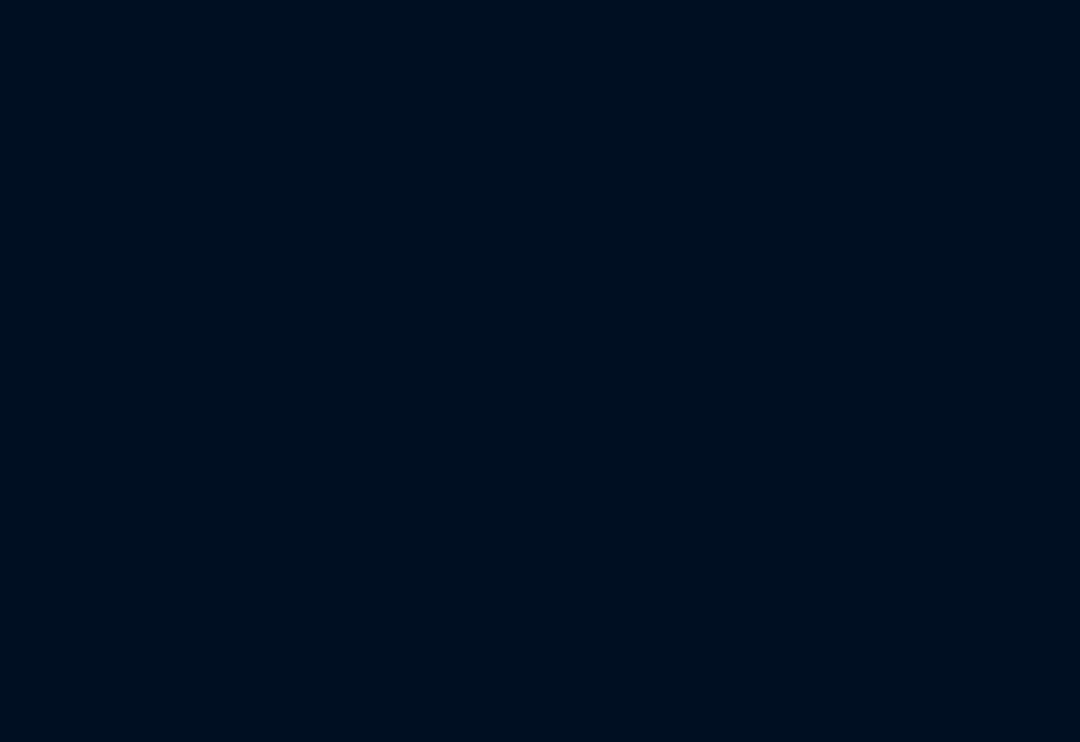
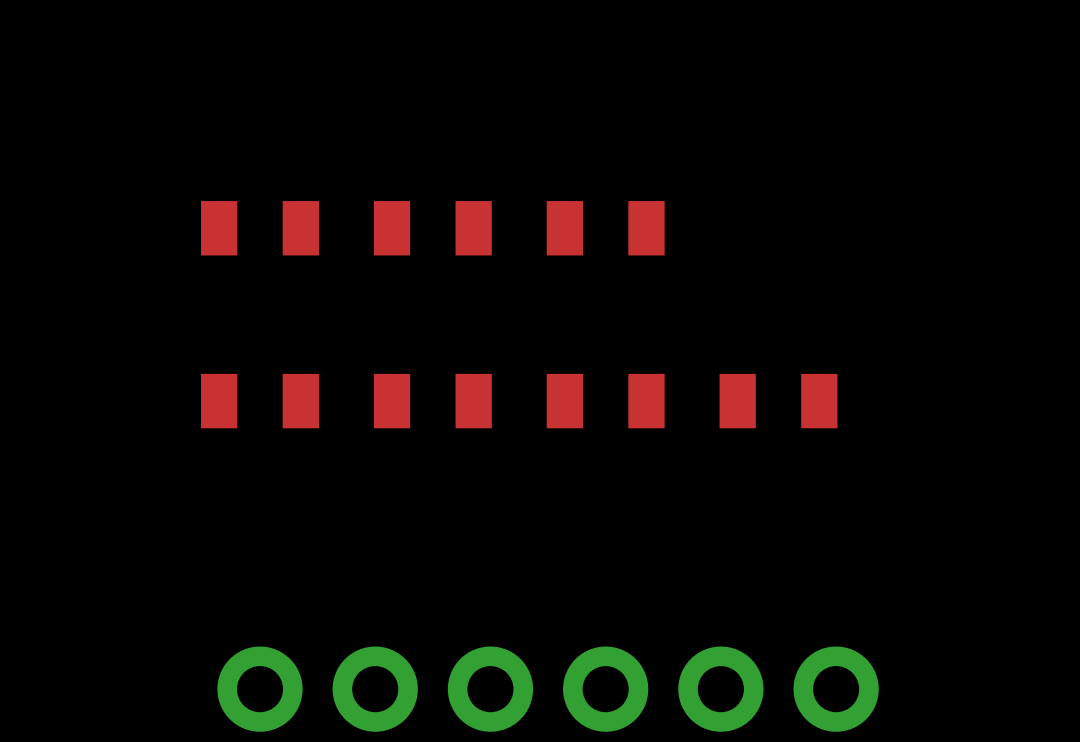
part: none -> (260, 228)
part: none -> (432, 228)
part: none -> (605, 228)
part: none -> (260, 401)
part: none -> (432, 401)
part: none -> (605, 401)
part: none -> (778, 401)
part: none -> (548, 689)

